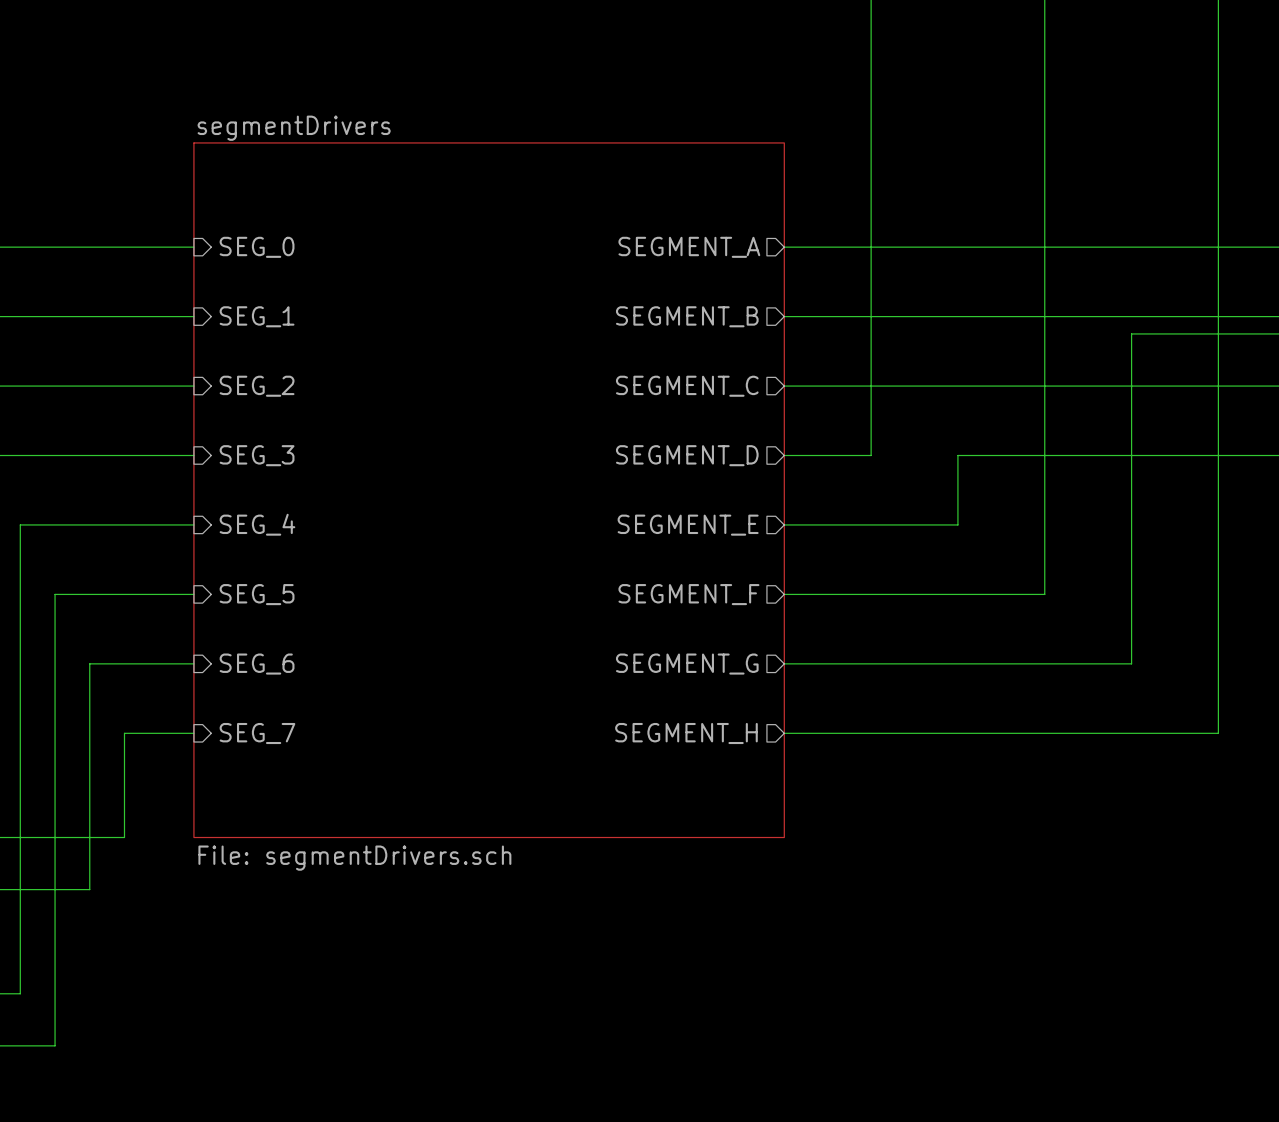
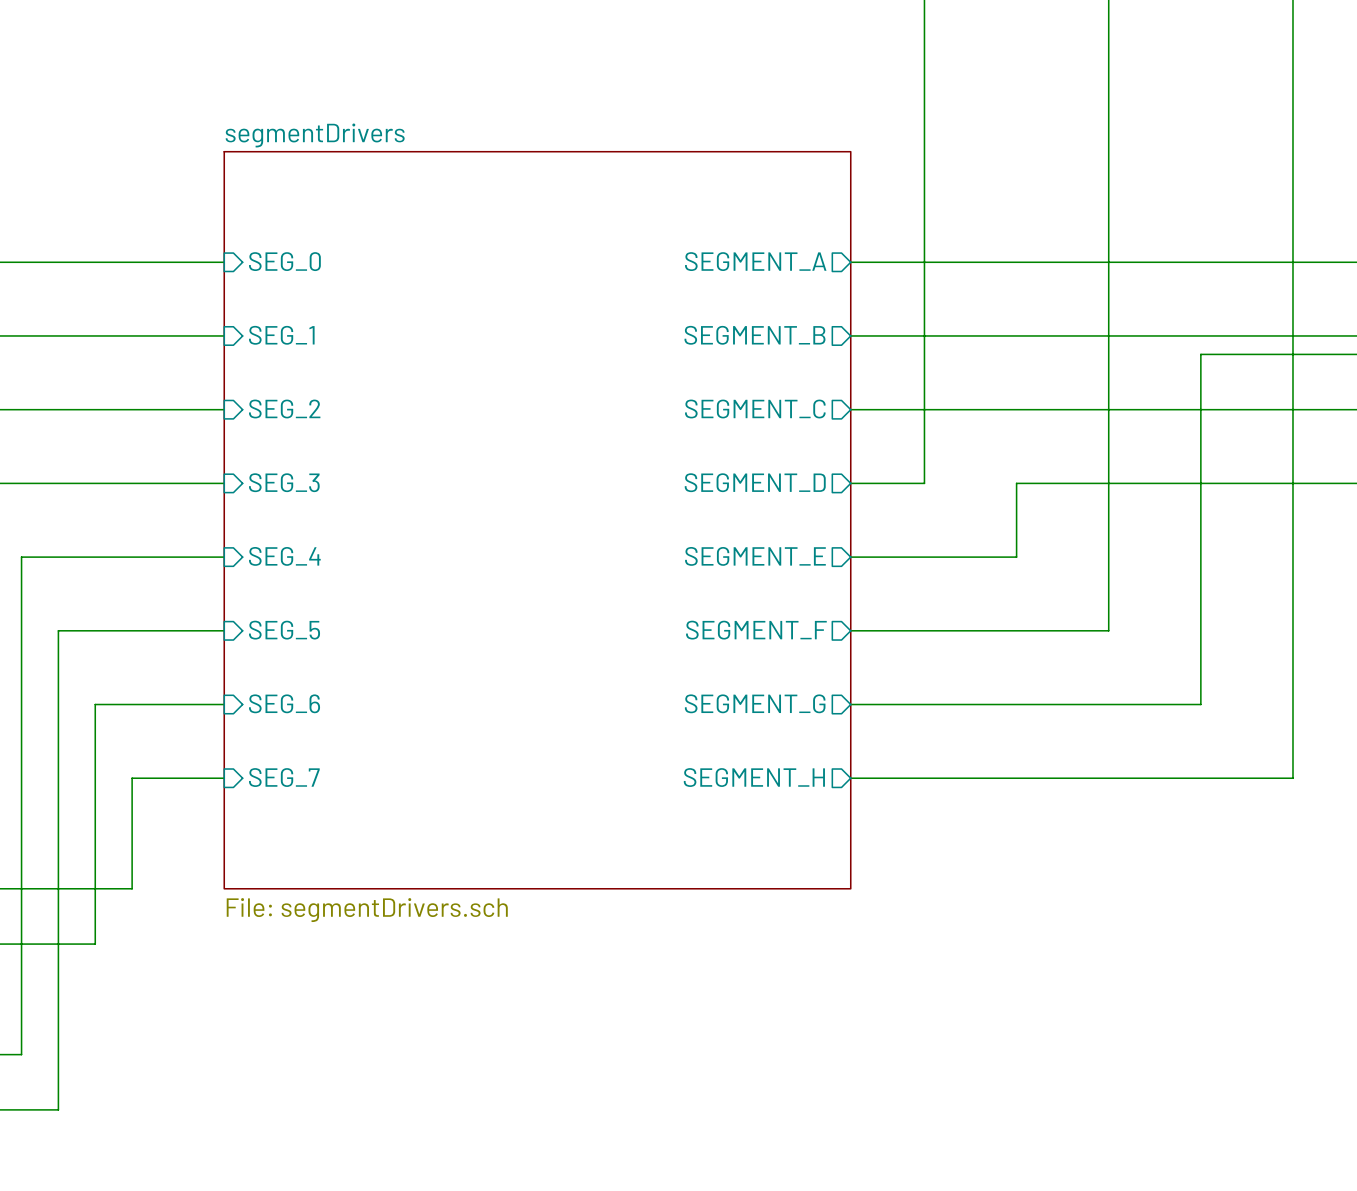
wire: none -> (205, 262) (224, 262)
sheet pin position: SEG_0 (257, 247) -> SEG_0 (284, 261)
sheet pin position: SEGMENT_A (689, 247) -> SEGMENT_A (755, 261)
wire: (784, 247) (801, 247) -> none
wire: none -> (205, 335) (224, 335)
sheet pin position: SEG_1 (257, 316) -> SEG_1 (281, 335)
sheet pin position: SEGMENT_B (687, 316) -> SEGMENT_B (754, 335)
wire: (784, 316) (801, 316) -> none
wire: none -> (205, 409) (224, 409)
sheet pin position: SEG_2 (257, 386) -> SEG_2 (284, 409)
sheet pin position: SEGMENT_C (687, 386) -> SEGMENT_C (755, 409)
wire: (784, 386) (801, 386) -> none
wire: none -> (205, 483) (224, 483)
sheet pin position: SEG_3 (257, 455) -> SEG_3 (284, 482)
sheet pin position: SEGMENT_D (687, 455) -> SEGMENT_D (755, 482)
wire: (784, 455) (801, 455) -> none
sheet segmentDrivers position: (489, 490) -> (537, 520)
wire: none -> (205, 557) (224, 557)
sheet pin position: SEG_4 (257, 524) -> SEG_4 (284, 556)
wire: (784, 524) (801, 524) -> none
sheet pin position: SEGMENT_E (688, 525) -> SEGMENT_E (755, 556)
wire: none -> (205, 630) (224, 630)
sheet pin position: SEG_5 (257, 594) -> SEG_5 (284, 630)
sheet pin position: SEGMENT_F (688, 594) -> SEGMENT_F (756, 630)
wire: (784, 594) (801, 594) -> none
wire: none -> (205, 704) (224, 704)
wire: (784, 663) (801, 663) -> none
sheet pin position: SEG_6 (257, 664) -> SEG_6 (284, 703)
sheet pin position: SEGMENT_G (687, 664) -> SEGMENT_G (755, 703)
wire: none -> (205, 778) (224, 778)
sheet pin position: SEG_7 (257, 733) -> SEG_7 (284, 777)
sheet pin position: SEGMENT_H (686, 733) -> SEGMENT_H (754, 777)
wire: (784, 733) (801, 733) -> none

